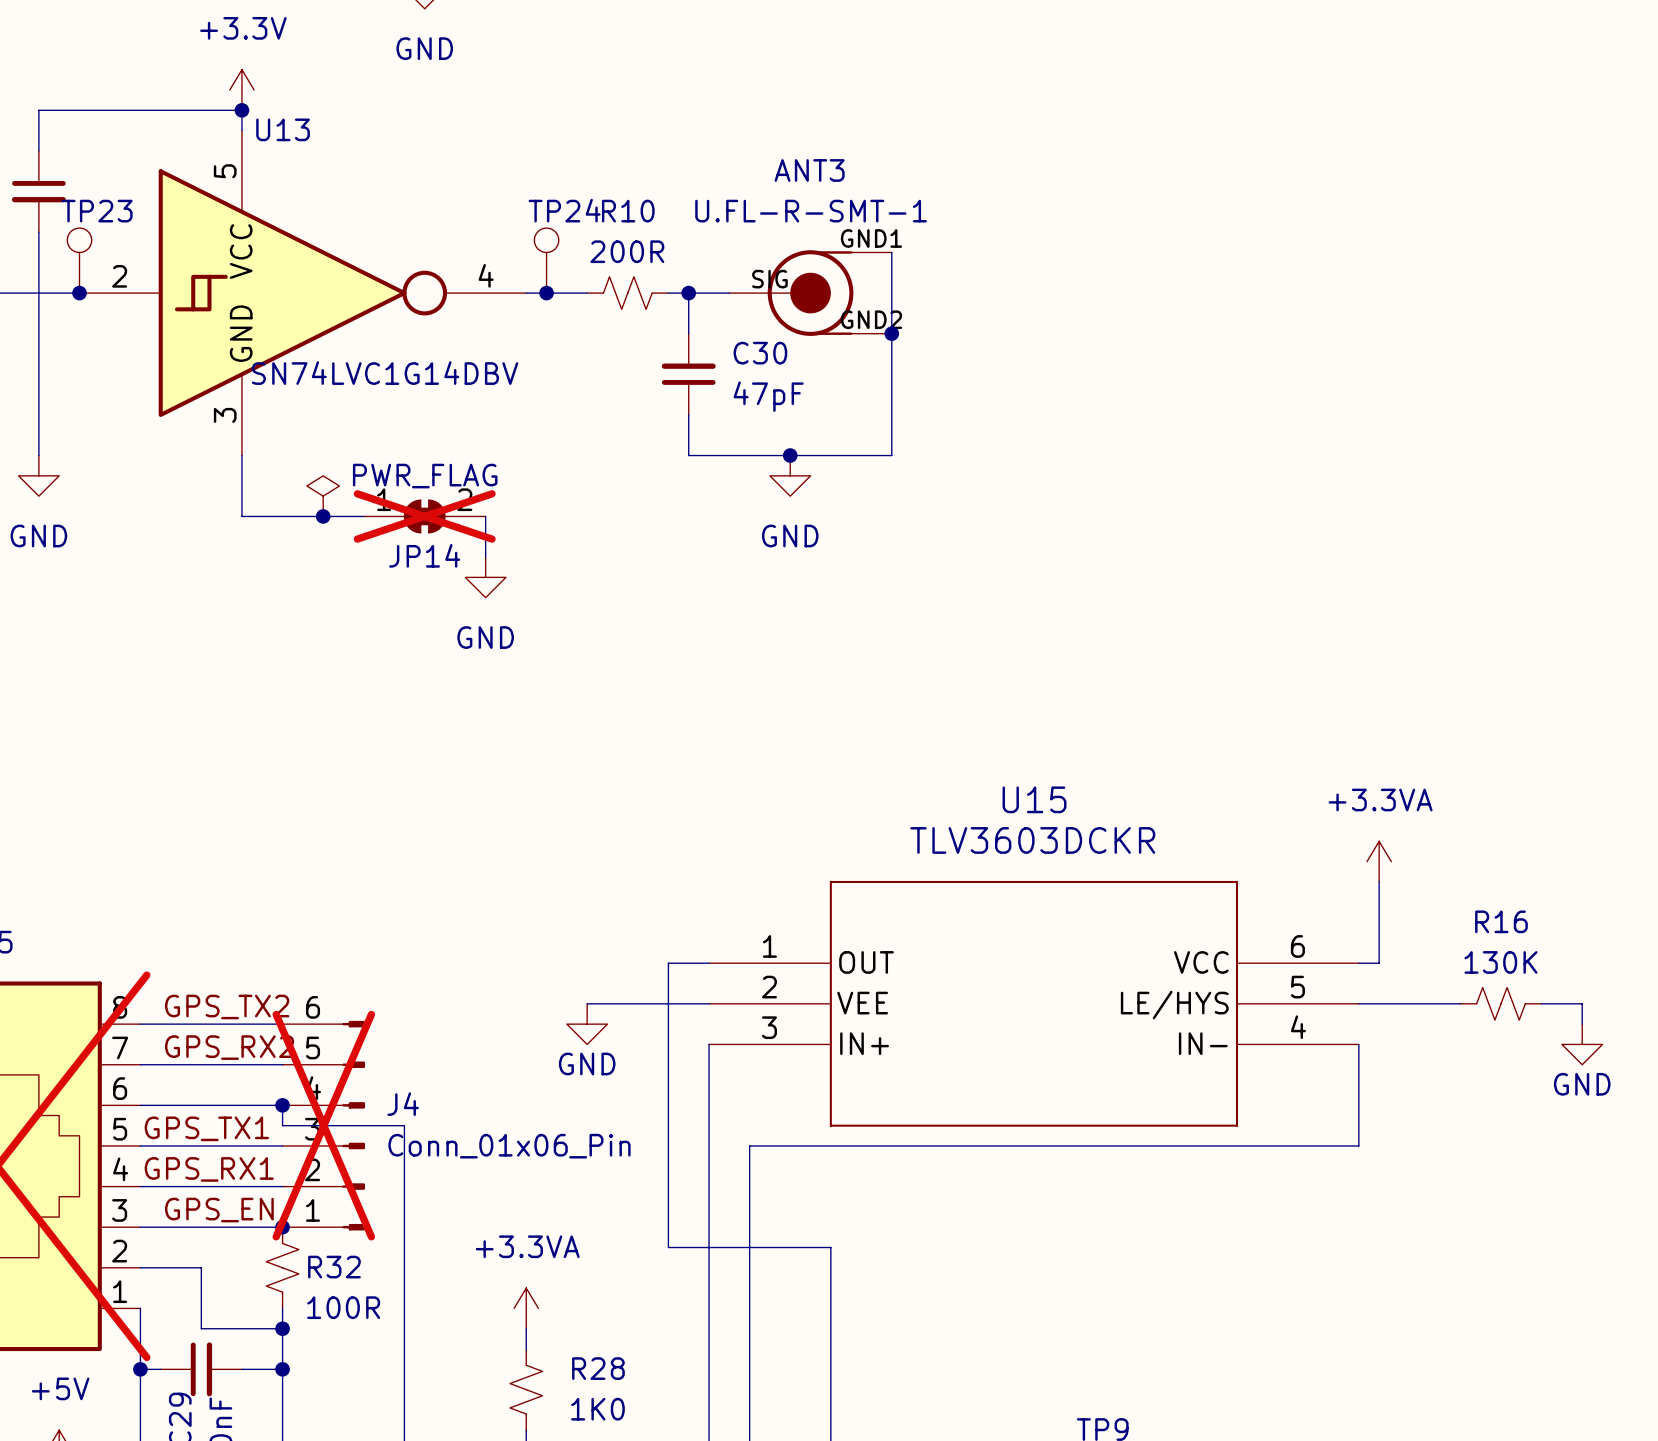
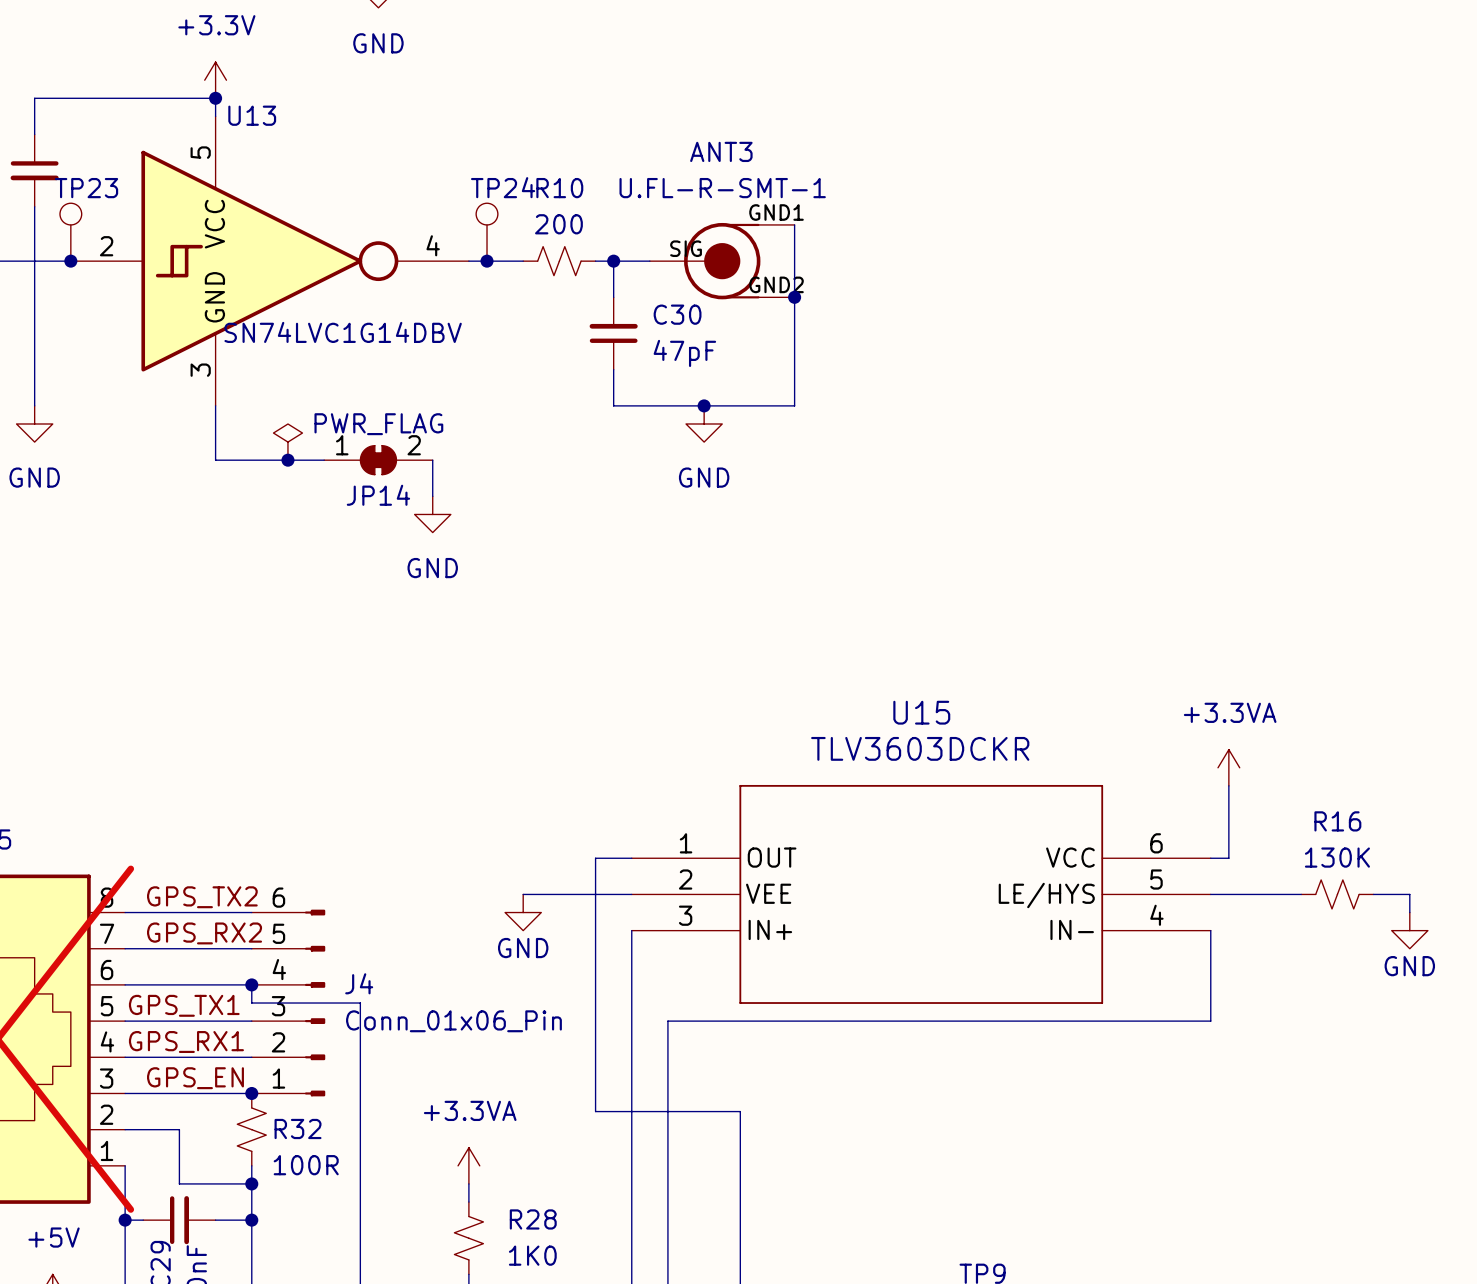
R10 value: 200R (627, 251) -> 200 (558, 224)
JP14 do-not-place cross: (424, 516) -> none
J4 do-not-place cross: (323, 1125) -> none

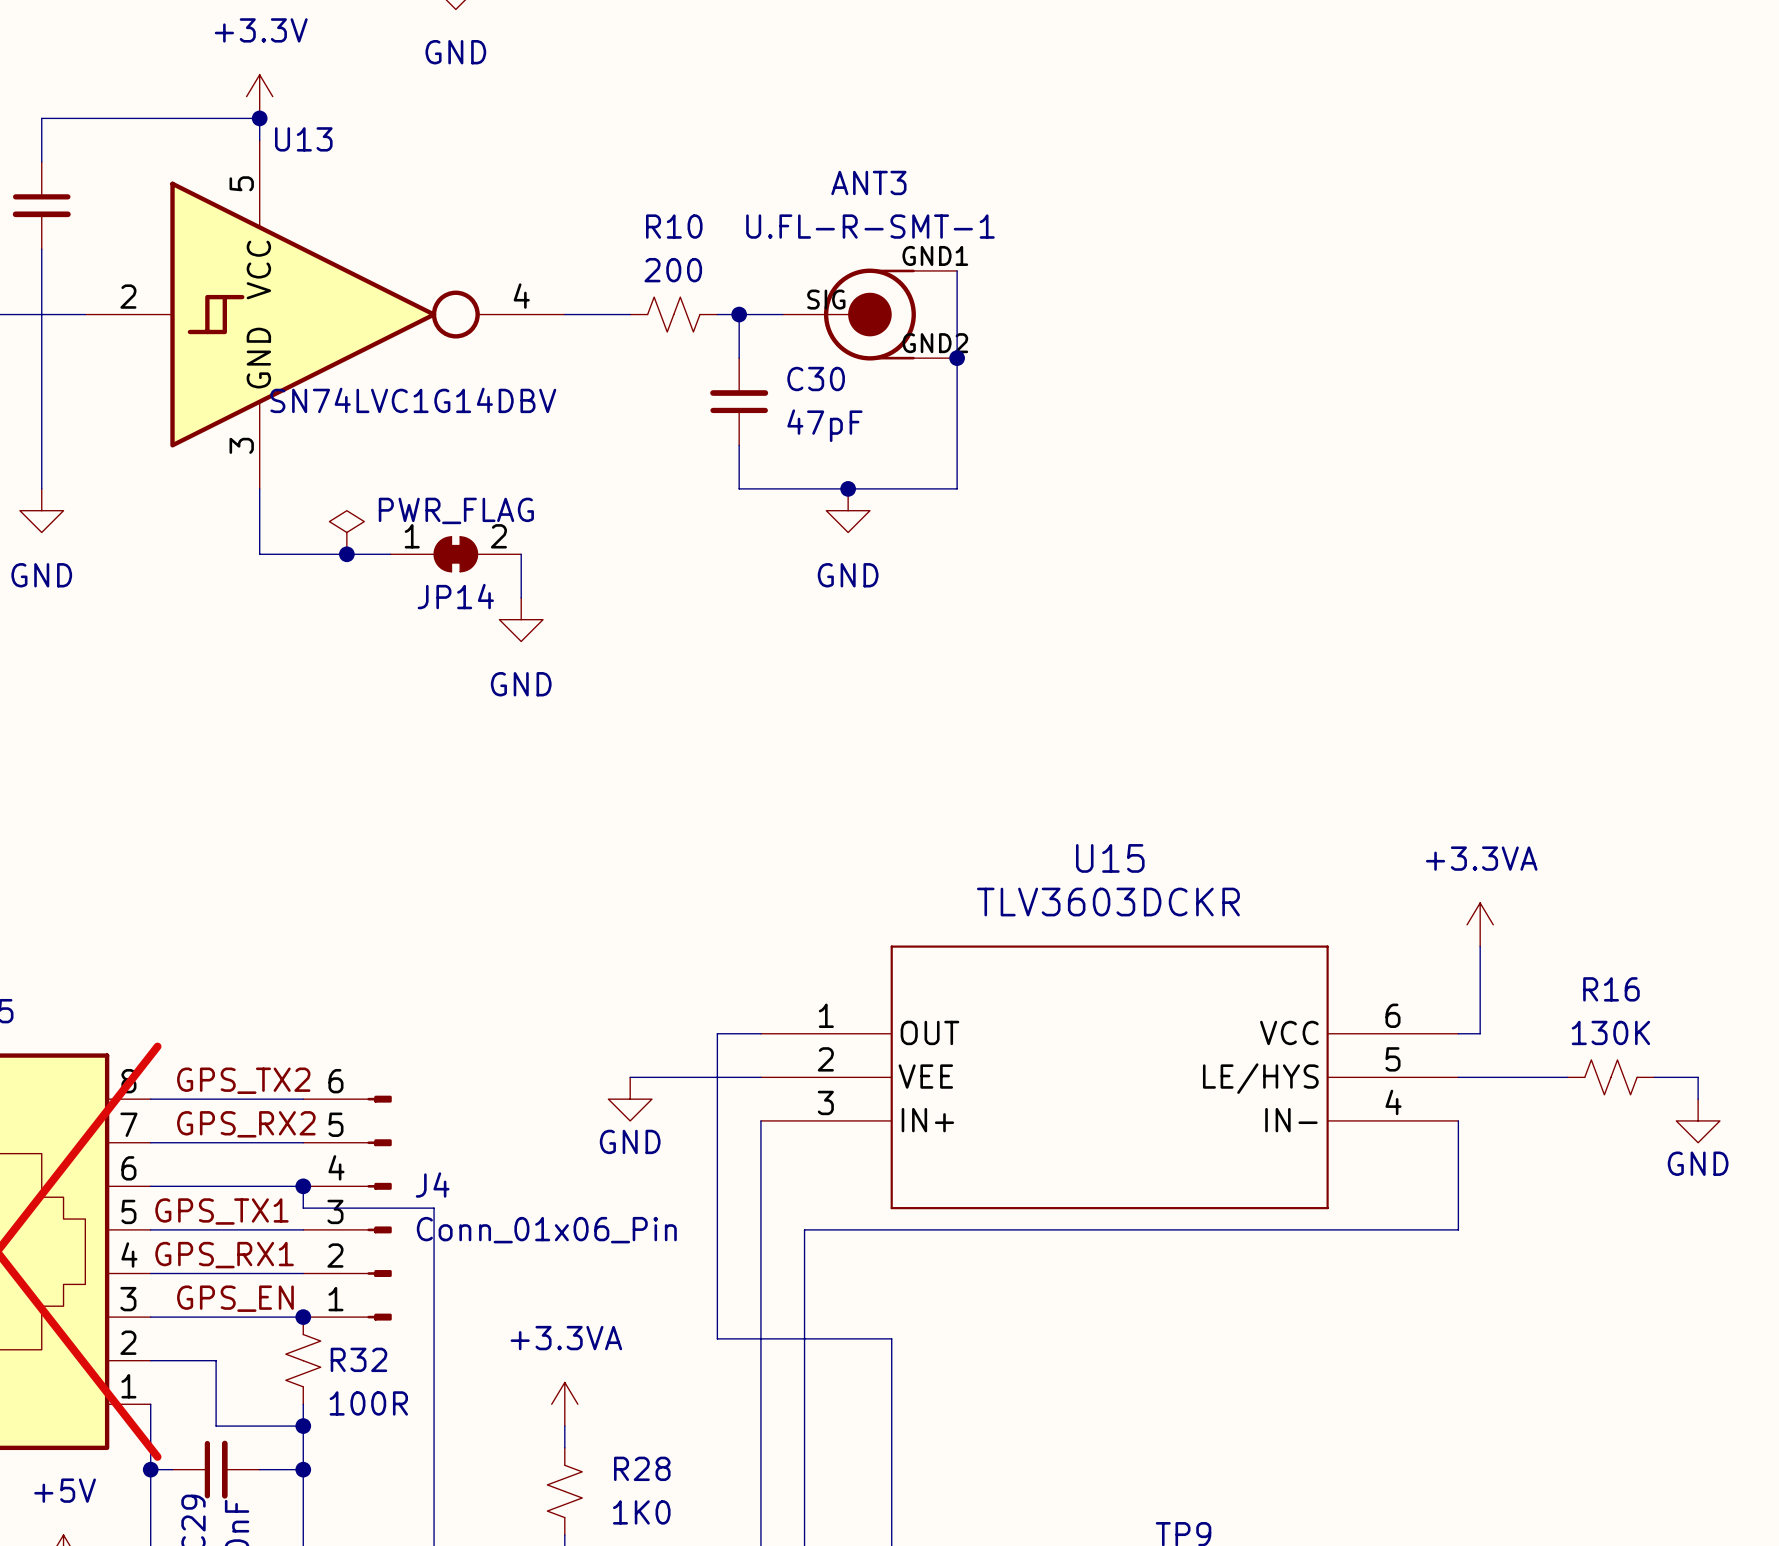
TP23: (70, 232) -> none
TP24: (487, 232) -> none
junction: (70, 261) -> none
junction: (487, 261) -> none

